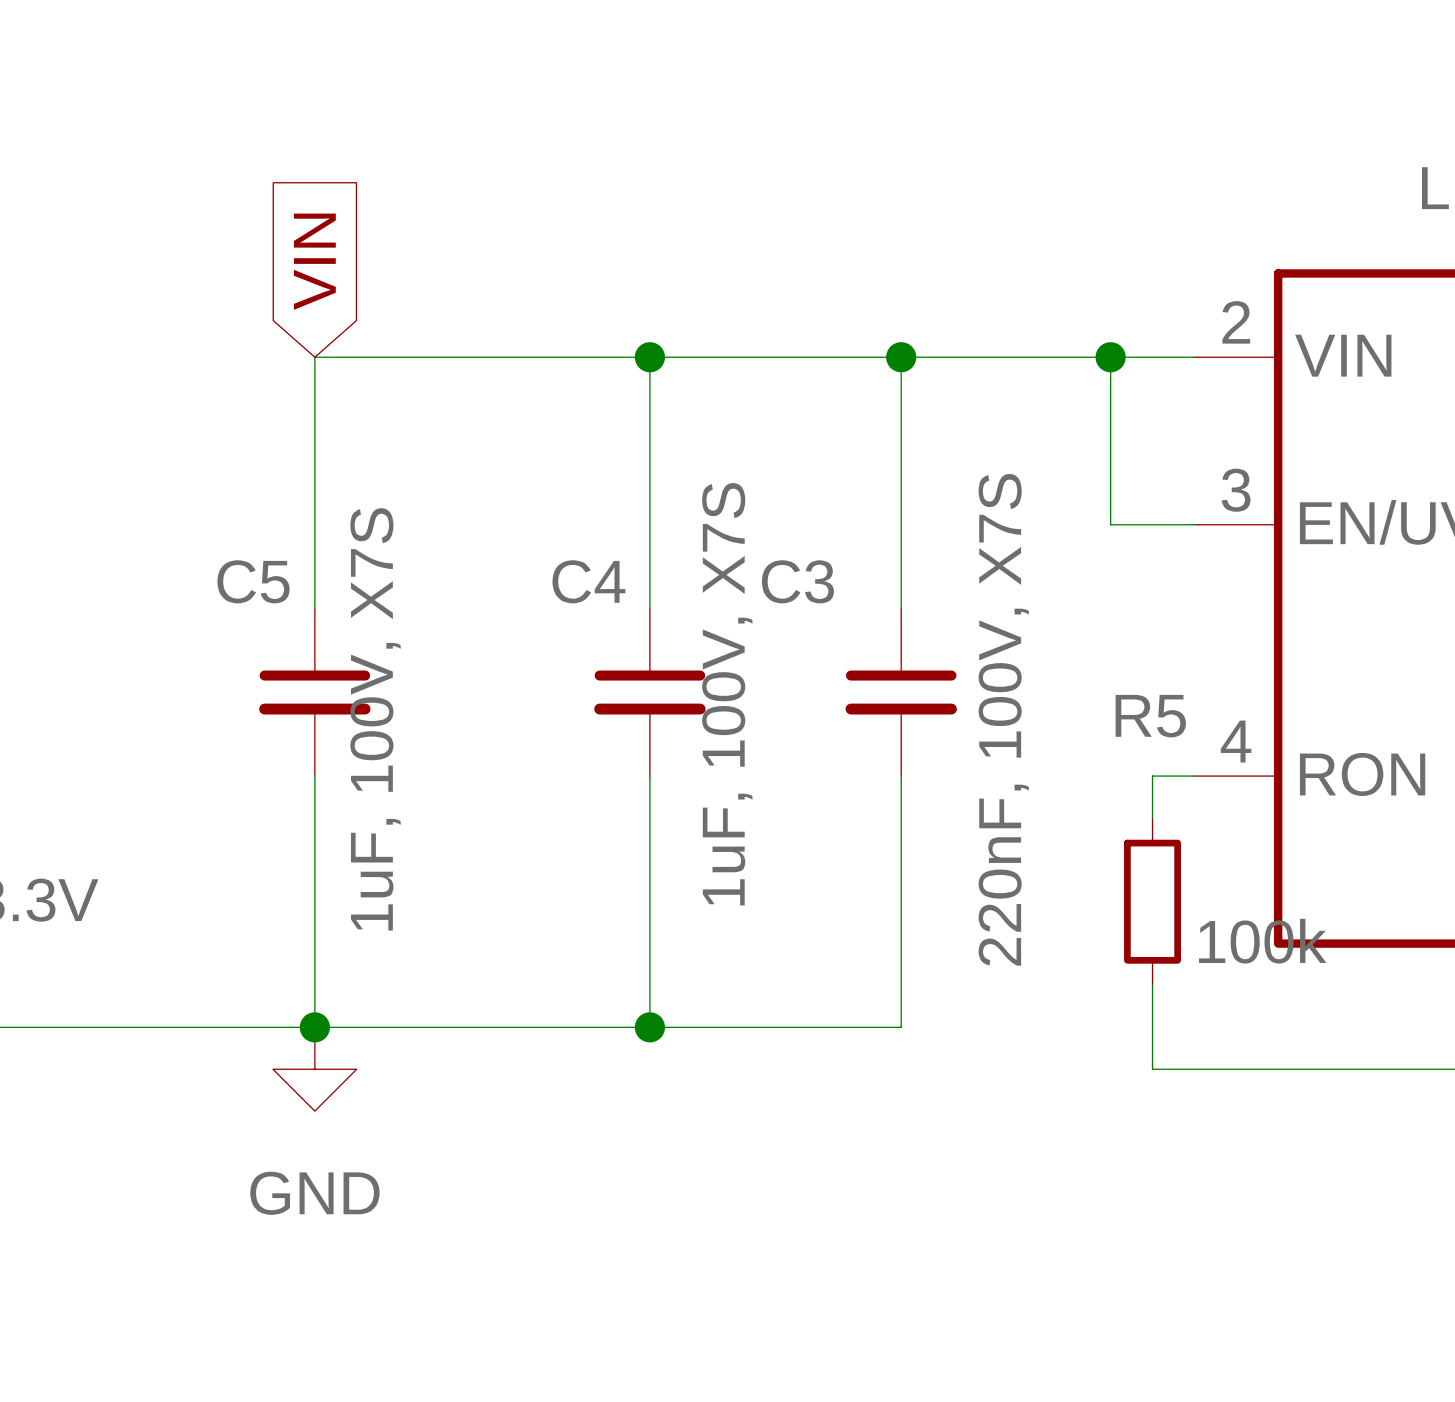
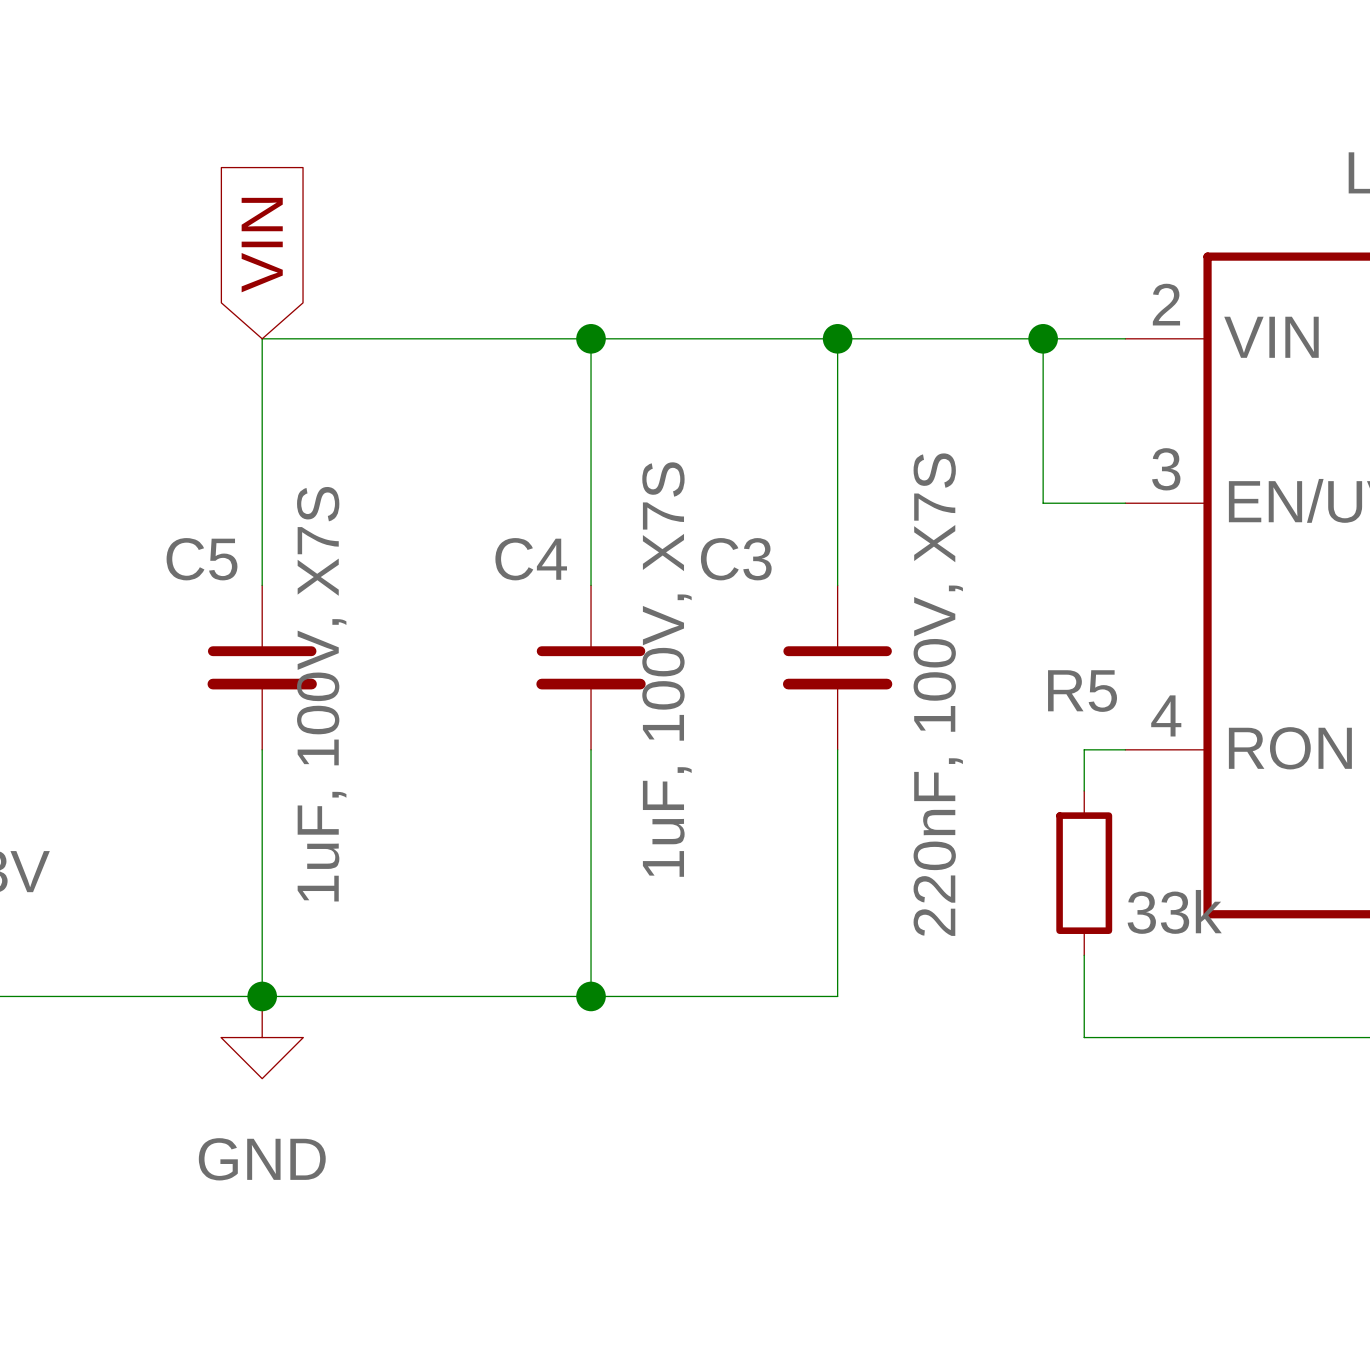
R5 value: 100k (1262, 941) -> 33k (1174, 911)

